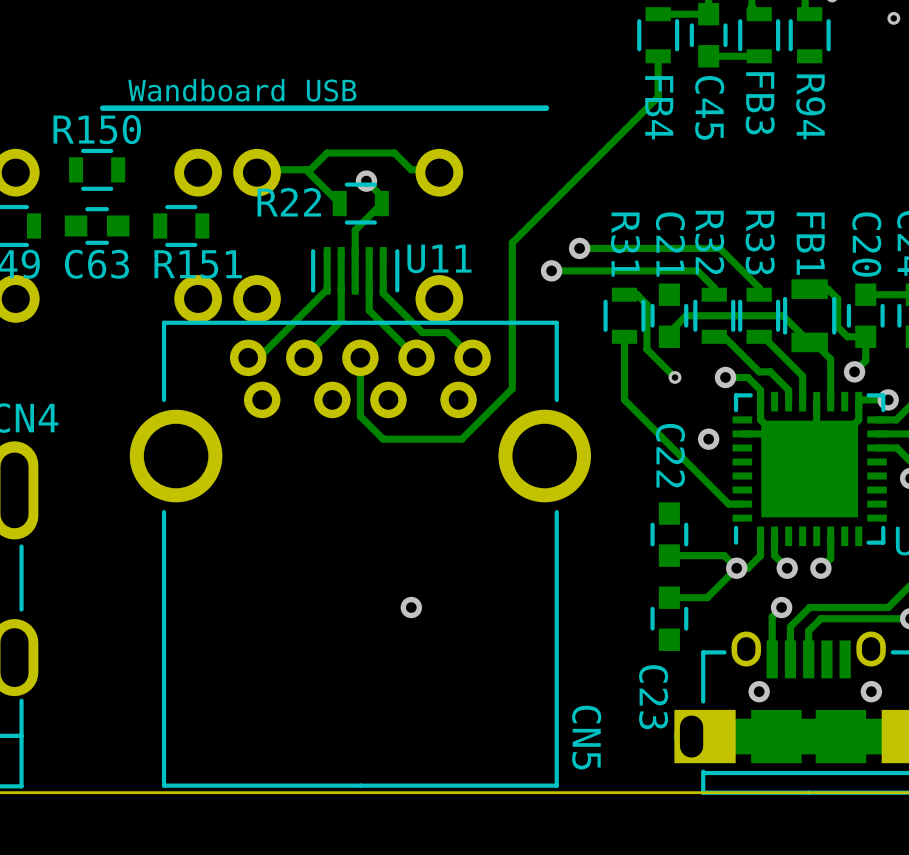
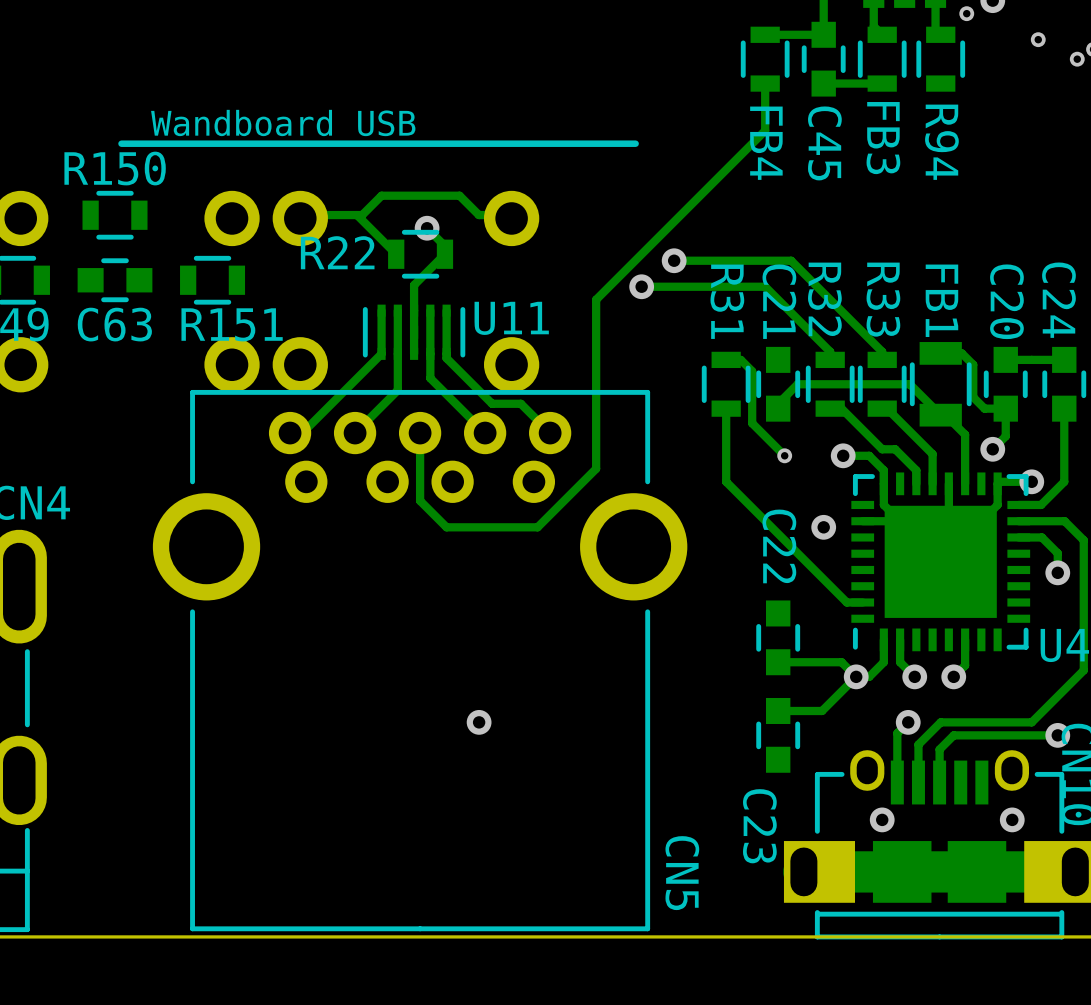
via: none -> (674, 260)
via: none -> (641, 286)
via: (579, 248) -> none
track: (719, 248) (579, 248) -> (836, 306) (791, 260) (674, 260)
via: (551, 270) -> none
track: (697, 270) (551, 270) -> (810, 332) (765, 286) (641, 286)

